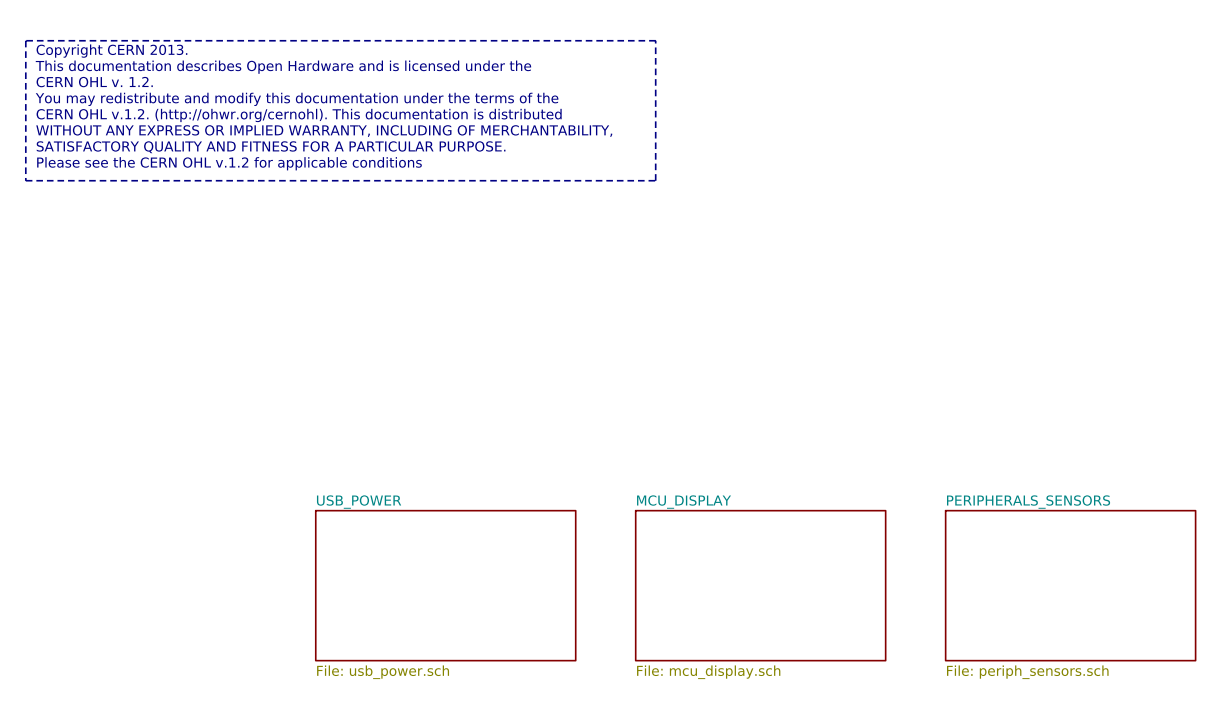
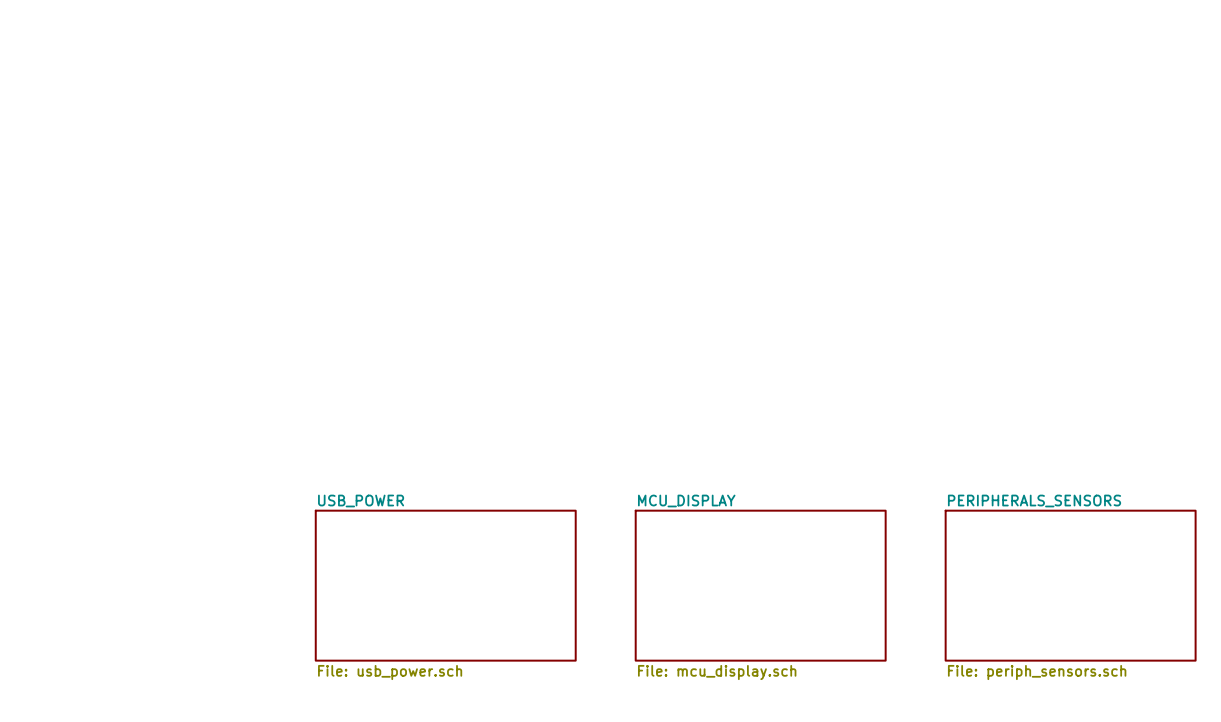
line: (25, 40) (25, 180) (655, 180) (655, 40) (25, 40) -> none
text: Copyright CERN 2013. (111, 51) -> none
text: This documentation describes Open Hardware and is licensed under the (283, 67) -> none
text: CERN OHL v. 1.2. (94, 82) -> none
text: You may redistribute and modify this documentation under the terms of the (297, 99) -> none
text: CERN OHL v.1.2. (http://ohwr.org/cernohl). This documentation is distributed (299, 115) -> none
text: WITHOUT ANY EXPRESS OR IMPLIED WARRANTY, INCLUDING OF MERCHANTABILITY, (324, 131) -> none
text: SATISFACTORY QUALITY AND FITNESS FOR A PARTICULAR PURPOSE. (271, 147) -> none
text: Please see the CERN OHL v.1.2 for applicable conditions (229, 163) -> none

